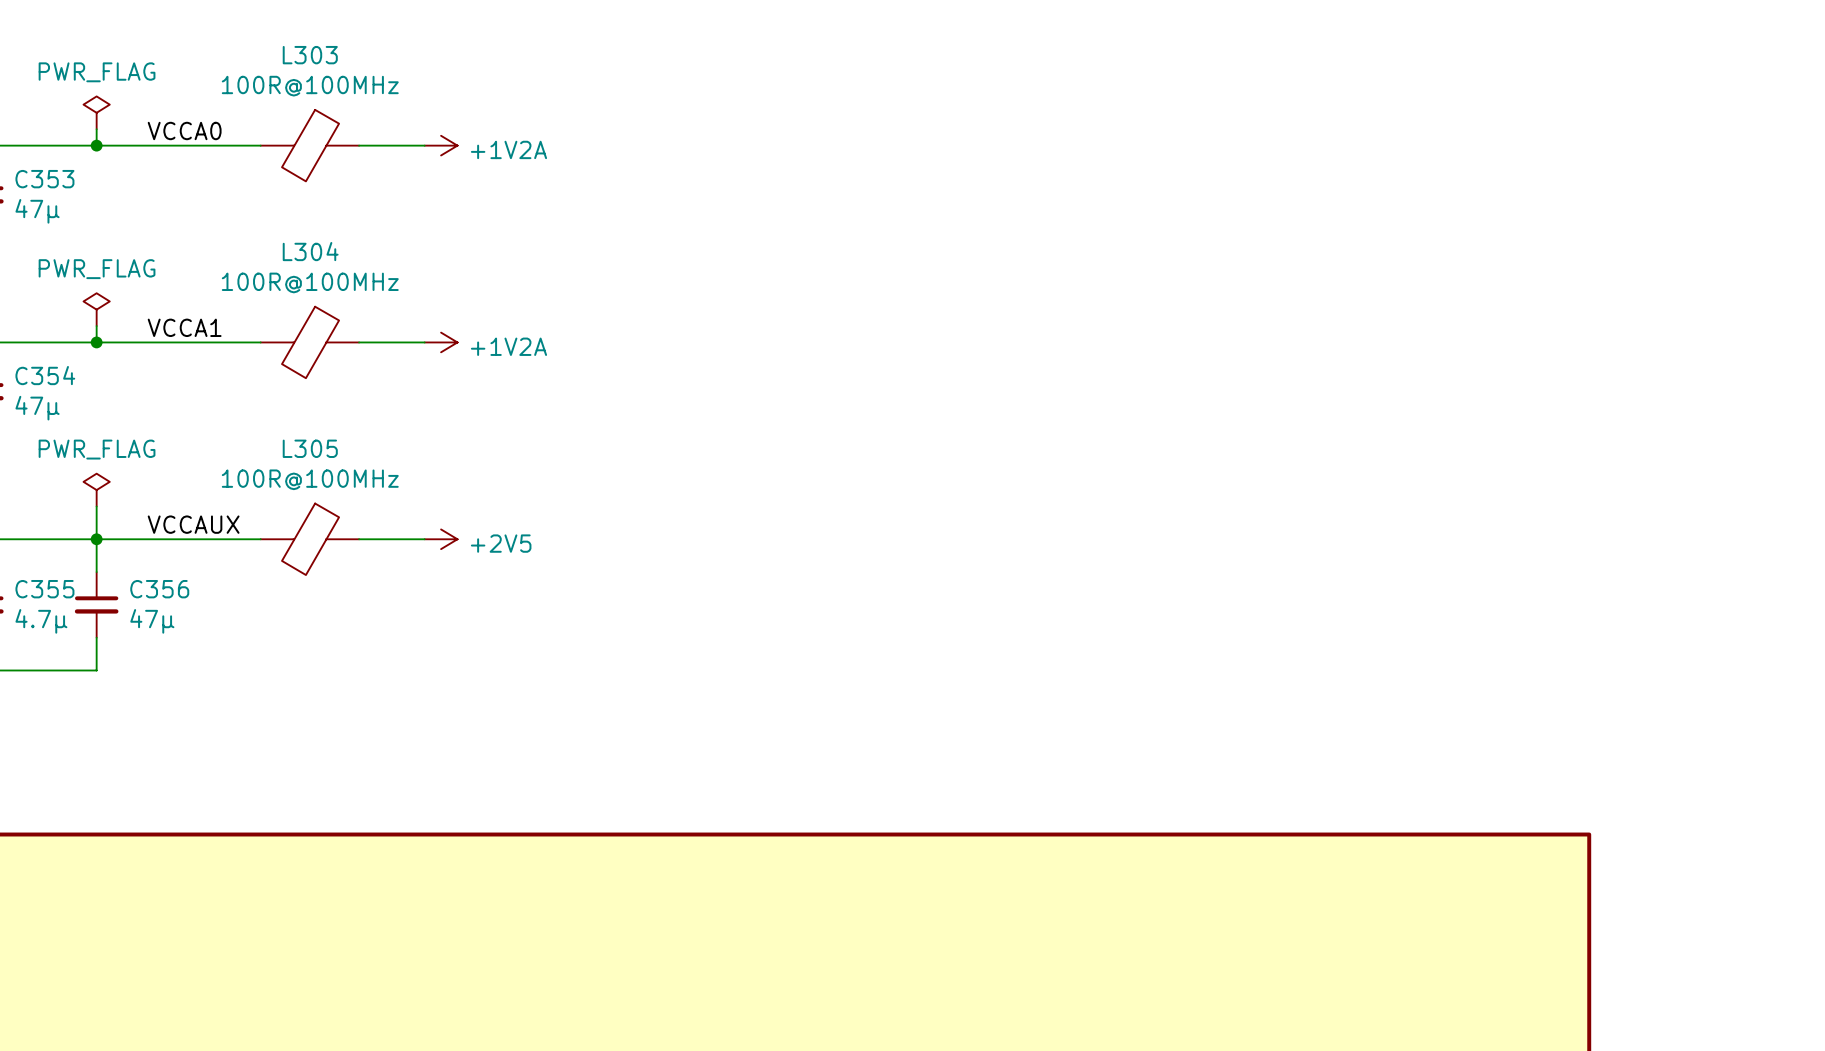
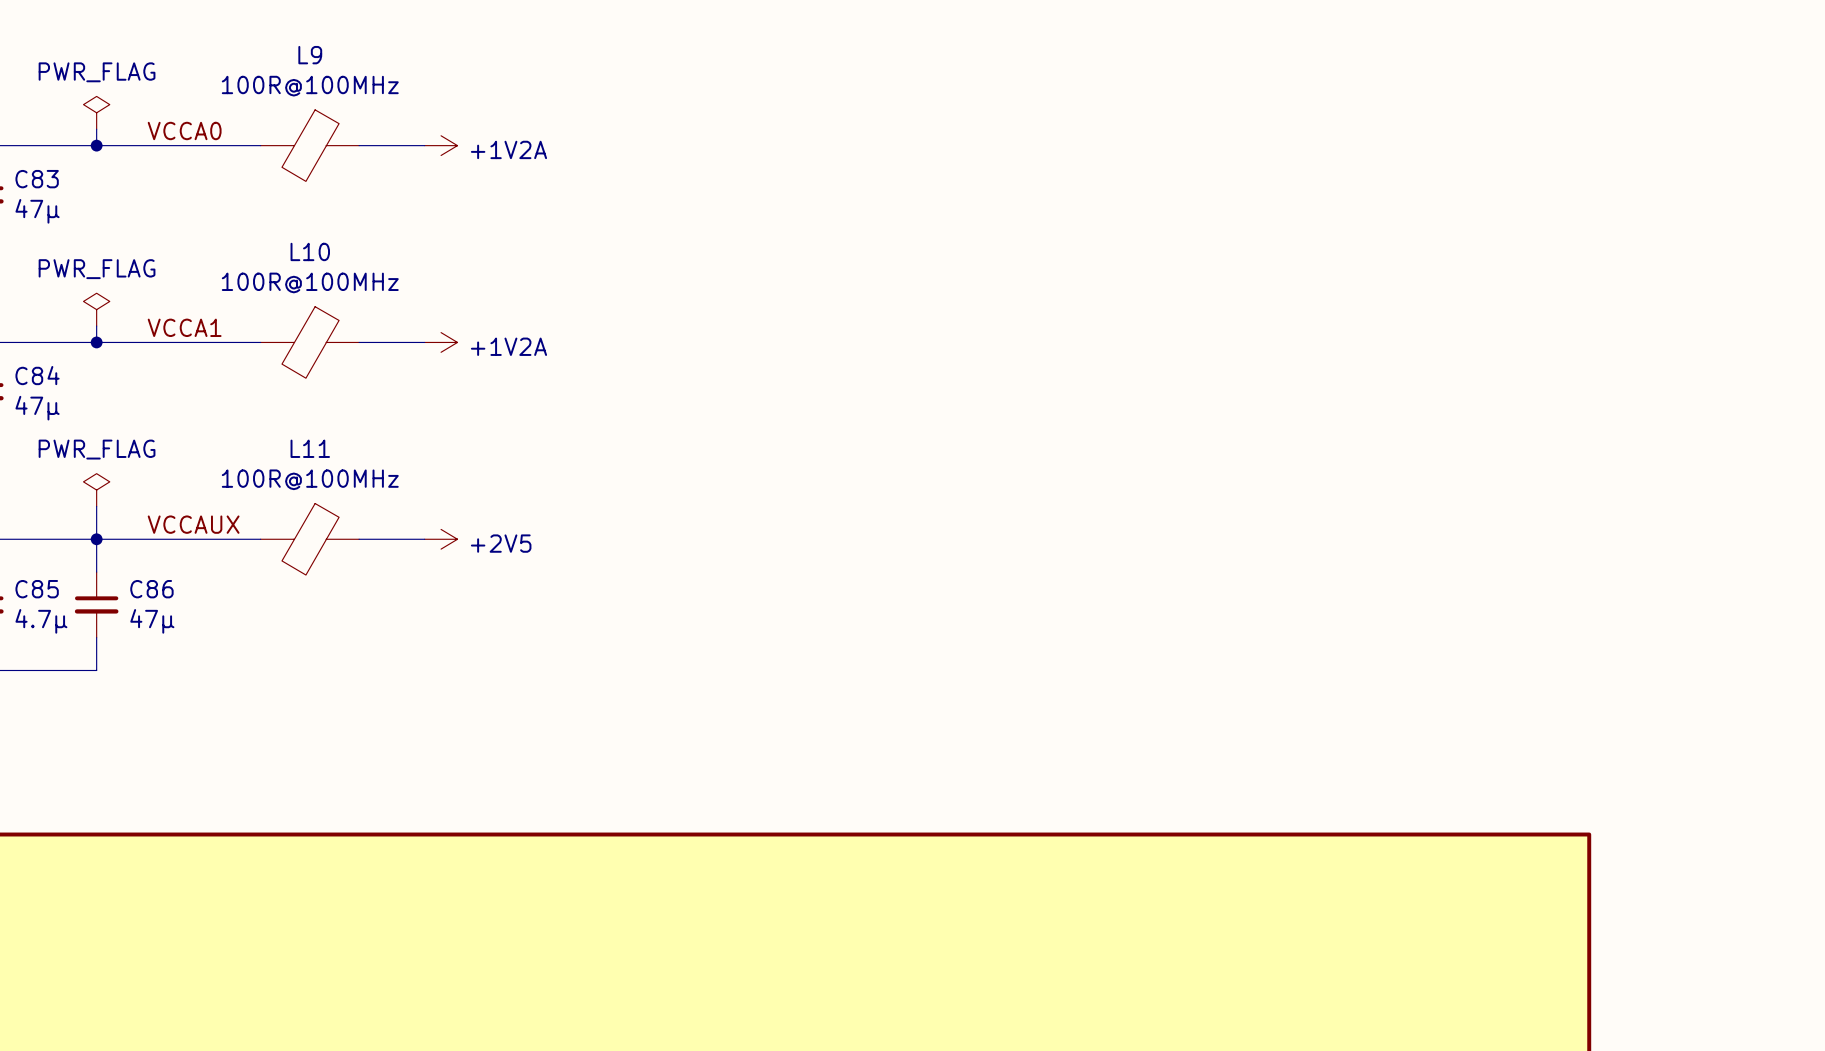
L303 name: L303 (310, 55) -> L9 (310, 55)
C353 name: C353 (44, 179) -> C83 (37, 179)
L304 name: L304 (310, 251) -> L10 (310, 251)
C354 name: C354 (45, 375) -> C84 (37, 375)
L305 name: L305 (310, 448) -> L11 (310, 448)
C355 name: C355 (44, 589) -> C85 (37, 589)
C356 name: C356 (159, 589) -> C86 (151, 589)

